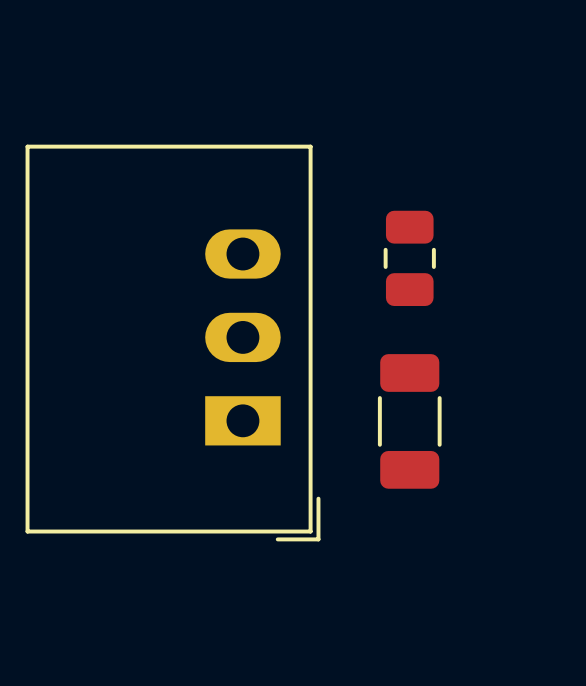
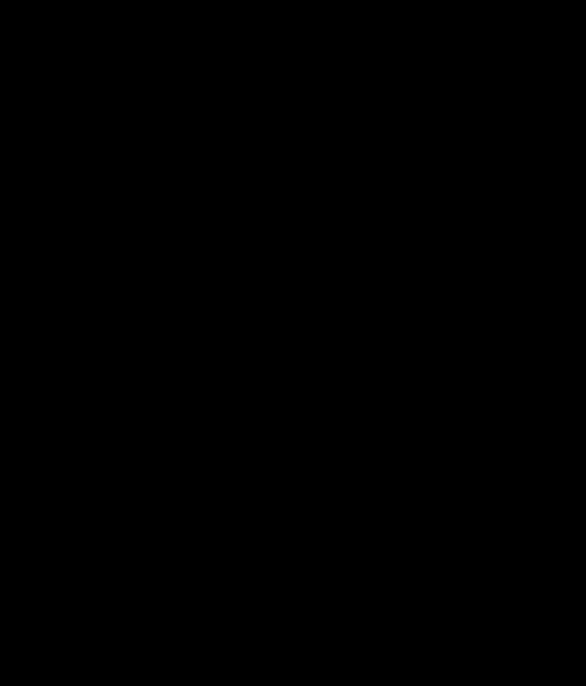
part: (409, 258) -> none
part: (173, 343) -> none
part: (409, 421) -> none

